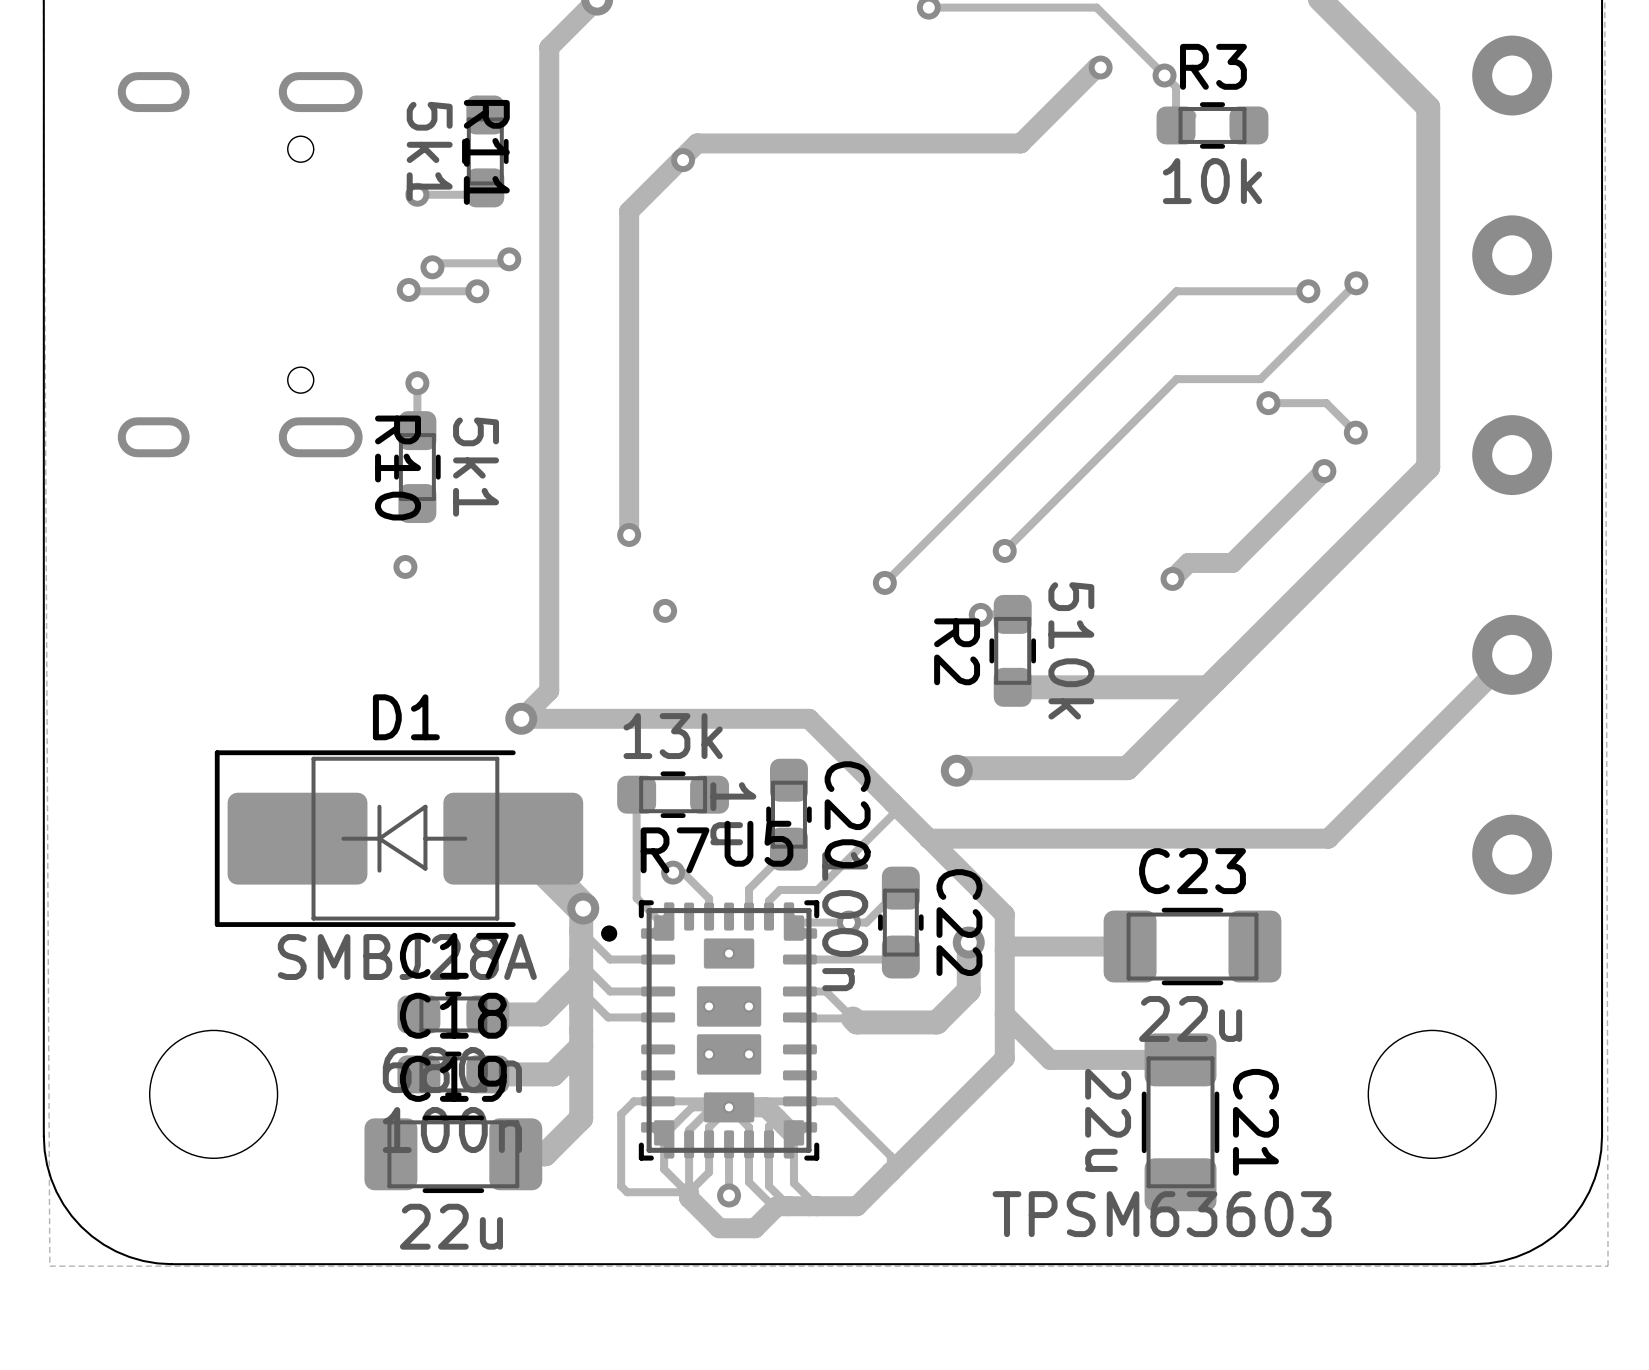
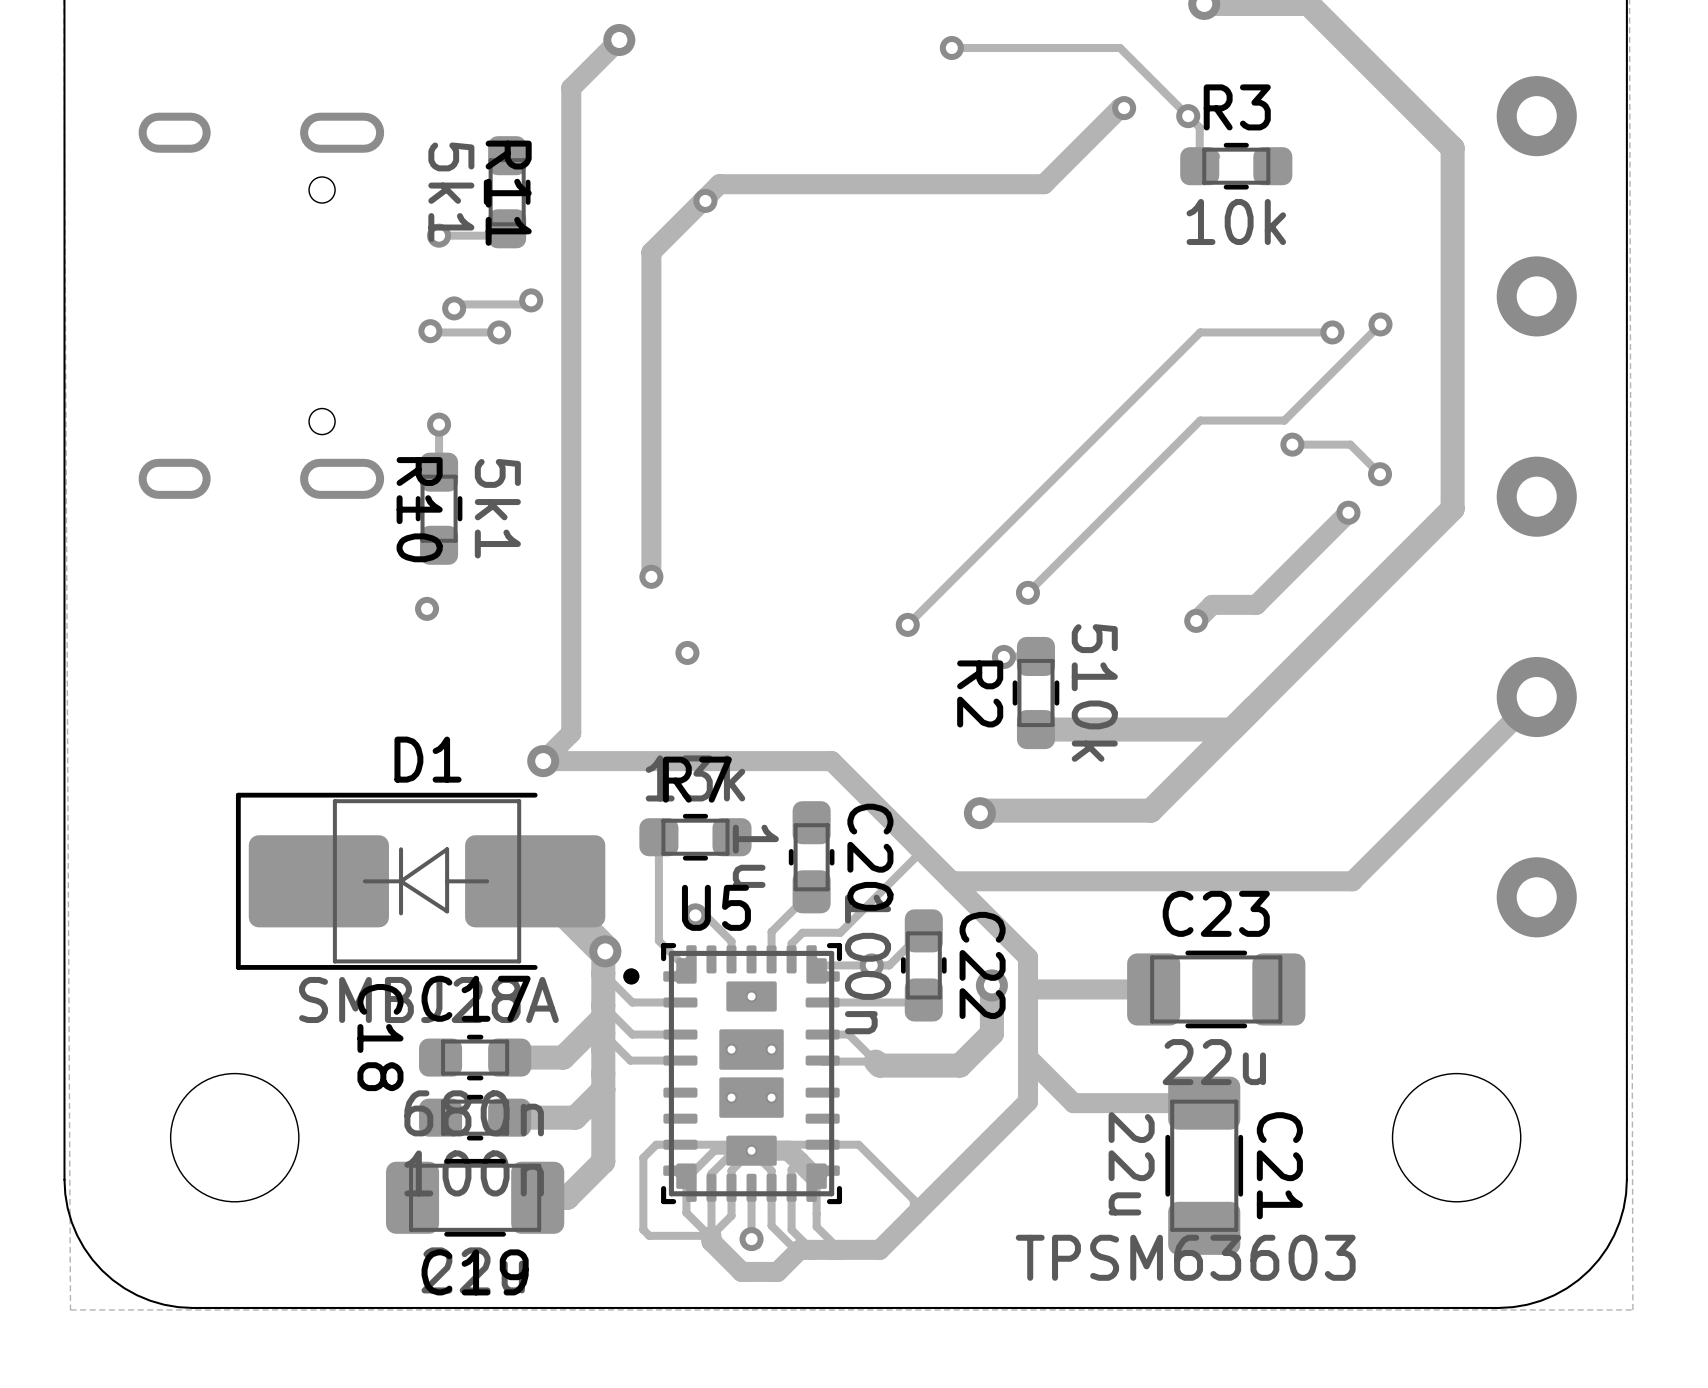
U5 name position: U5 (758, 843) -> U5 (716, 907)
R7 name position: R7 (675, 850) -> R7 (697, 779)
C18 name rotation: 0° (453, 1015) -> 90° clockwise (380, 1037)
C19 name position: C19 (453, 1078) -> C19 (475, 1272)

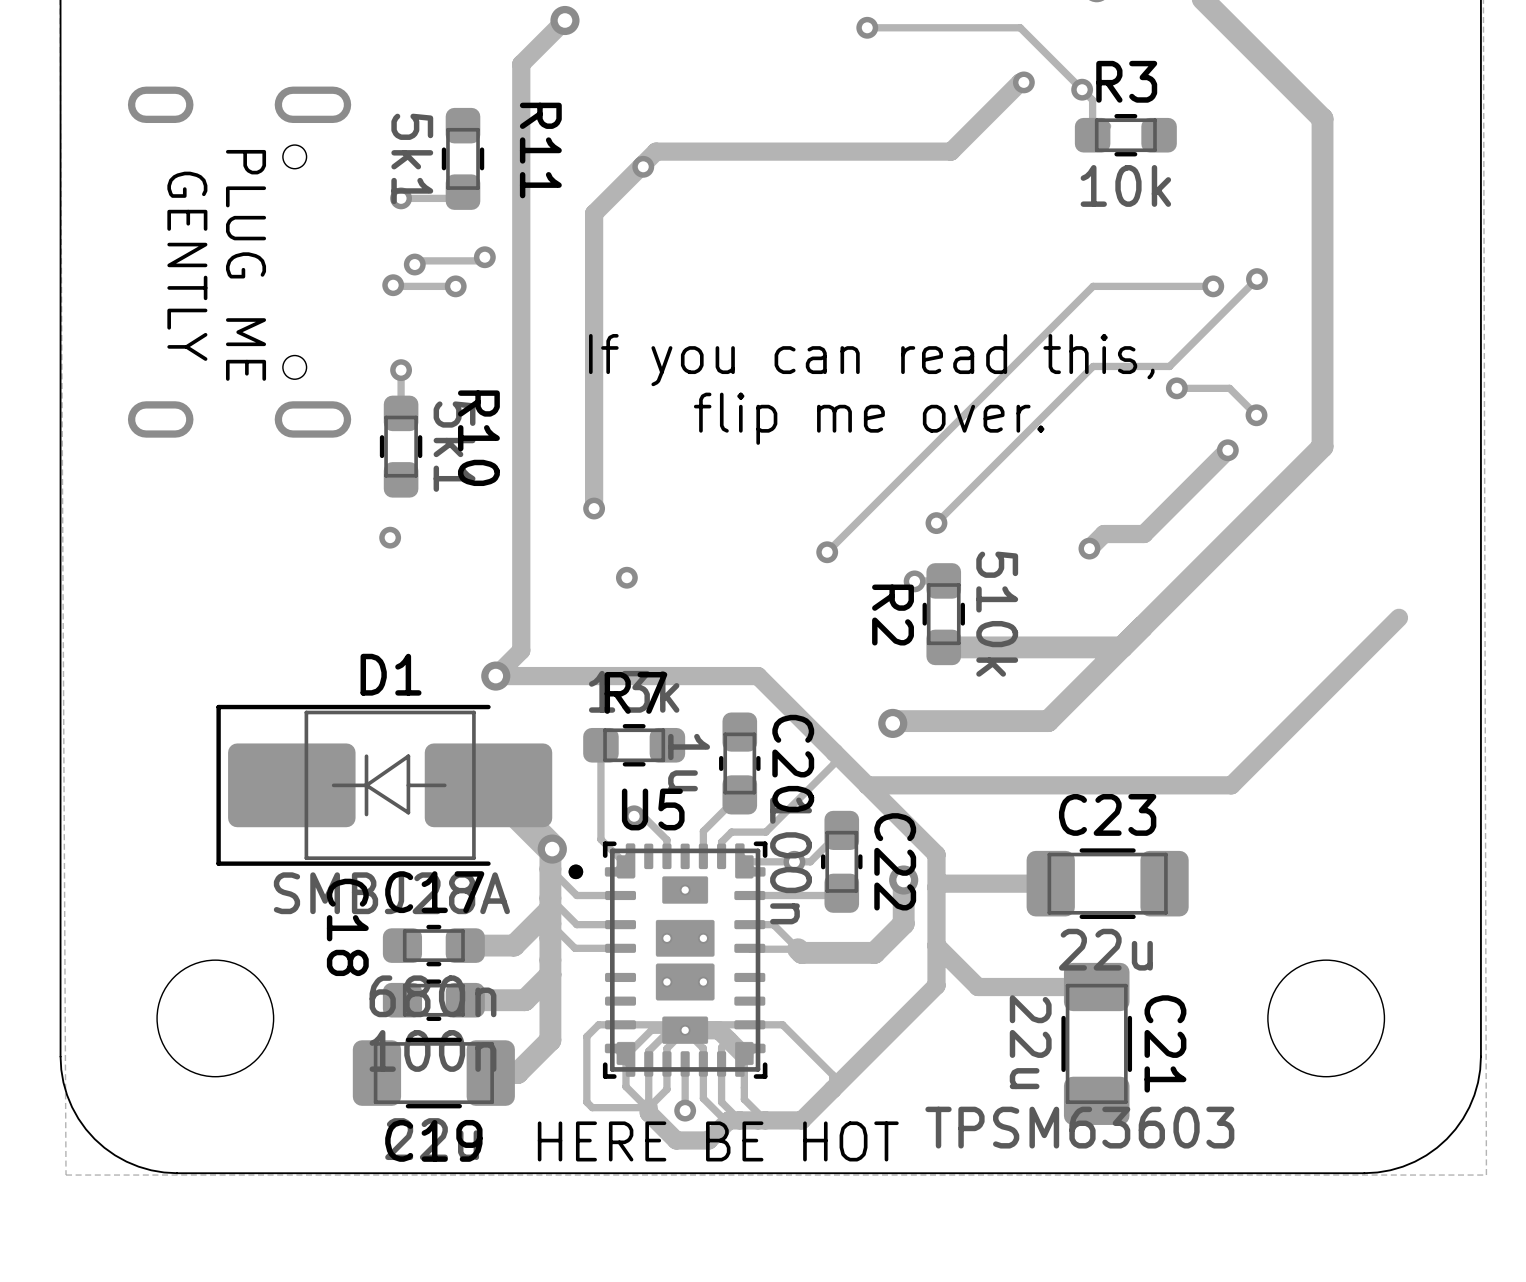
part: (1536, 116) -> none
R11 name position: R11 (508, 193) -> R11 (540, 150)
part: (1536, 296) -> none
text: none -> PLUG ME (246, 265)
text: none -> GENTLY (187, 266)
text: none -> If you can read this, (871, 360)
text: none -> flip me over. (869, 418)
part: (1536, 496) -> none
R10 name position: R10 (419, 509) -> R10 (478, 438)
part: (1536, 697) -> none
part: (1536, 897) -> none
text: none -> HERE BE HOT (718, 1141)

